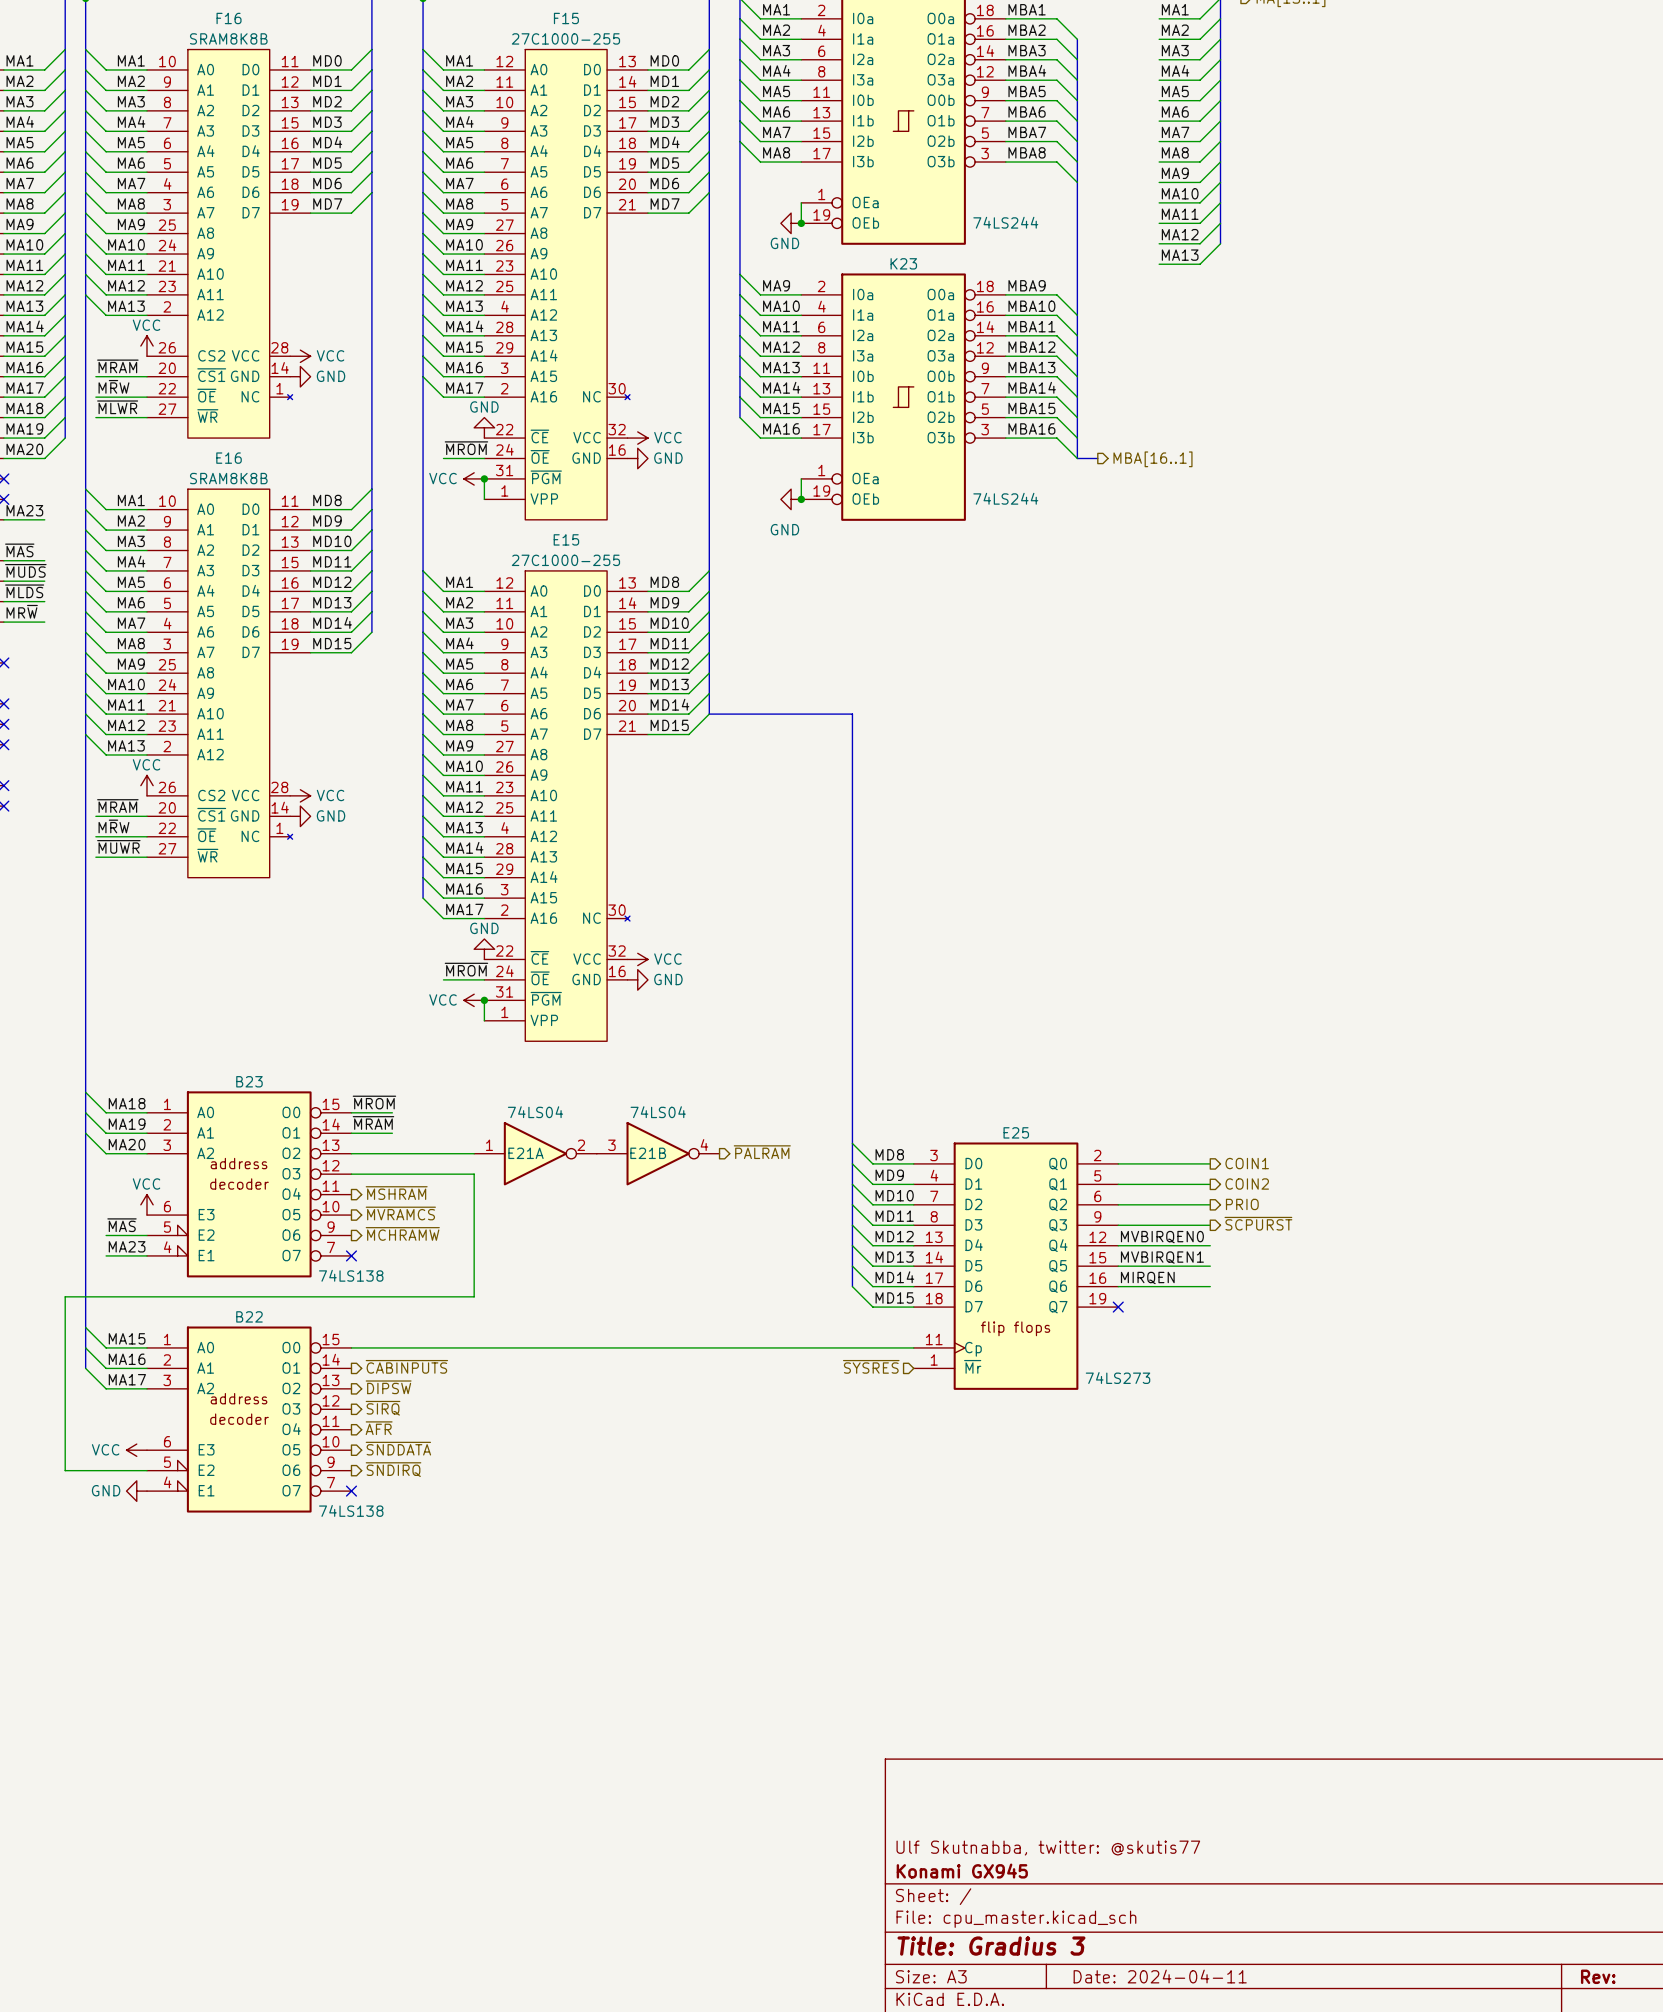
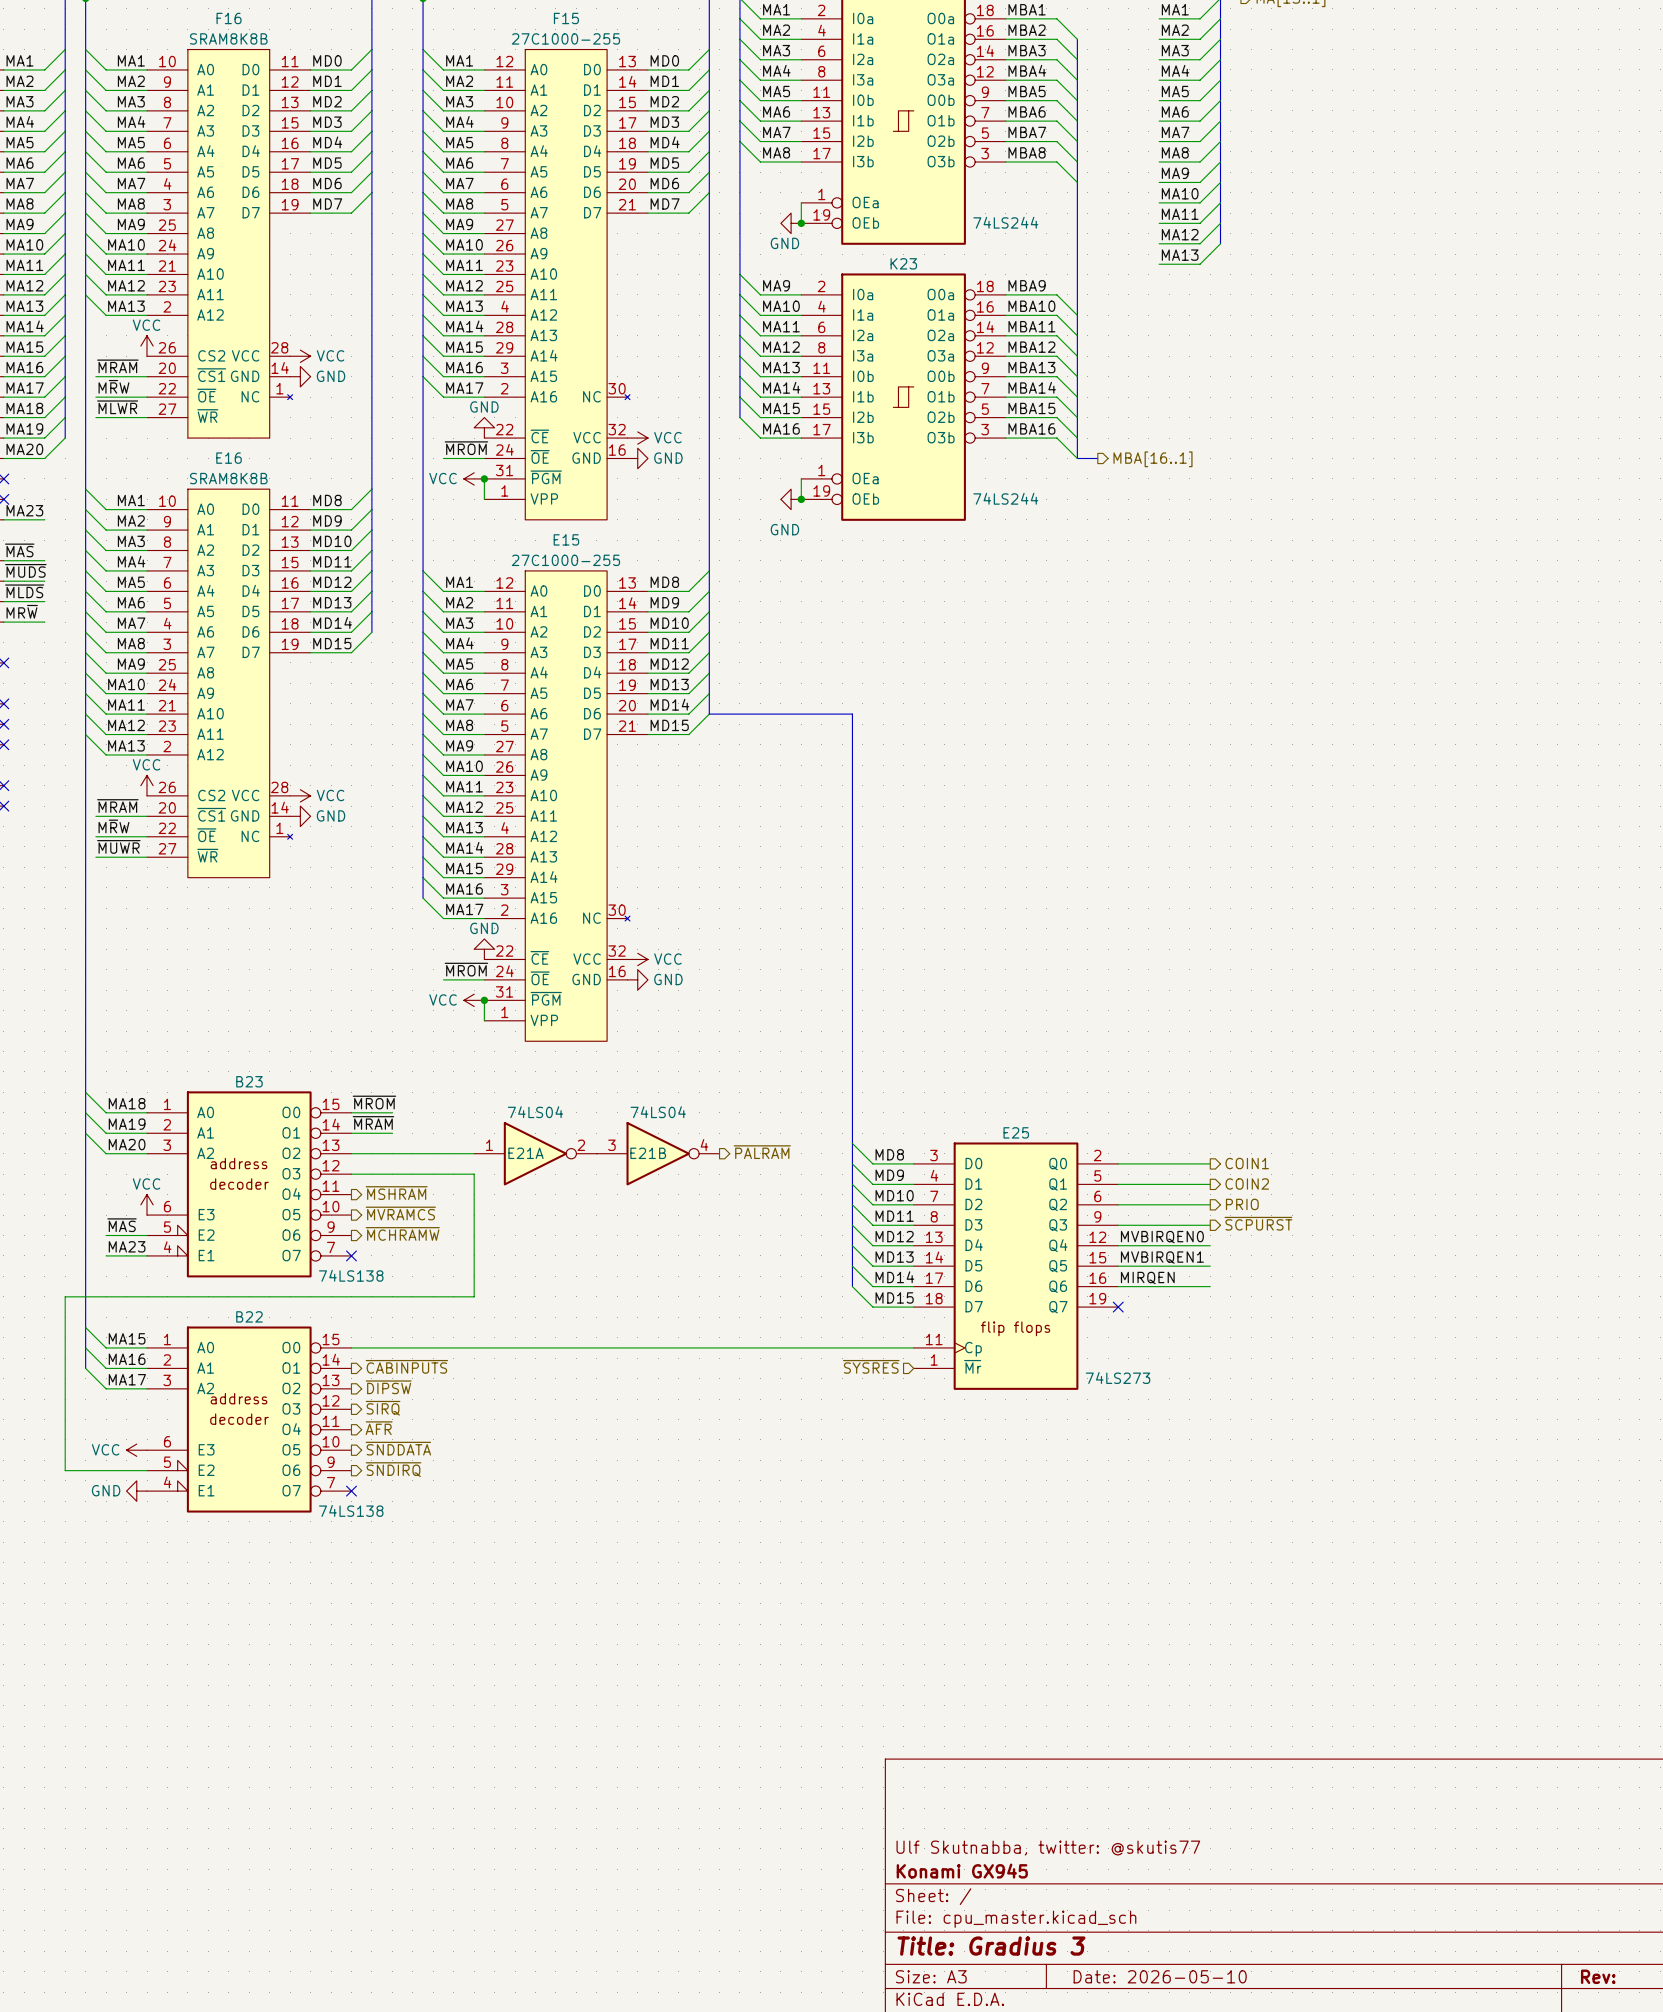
title block: Date: 2024-04-11 (1160, 1976) -> Date: 2026-05-10 (1160, 1976)

